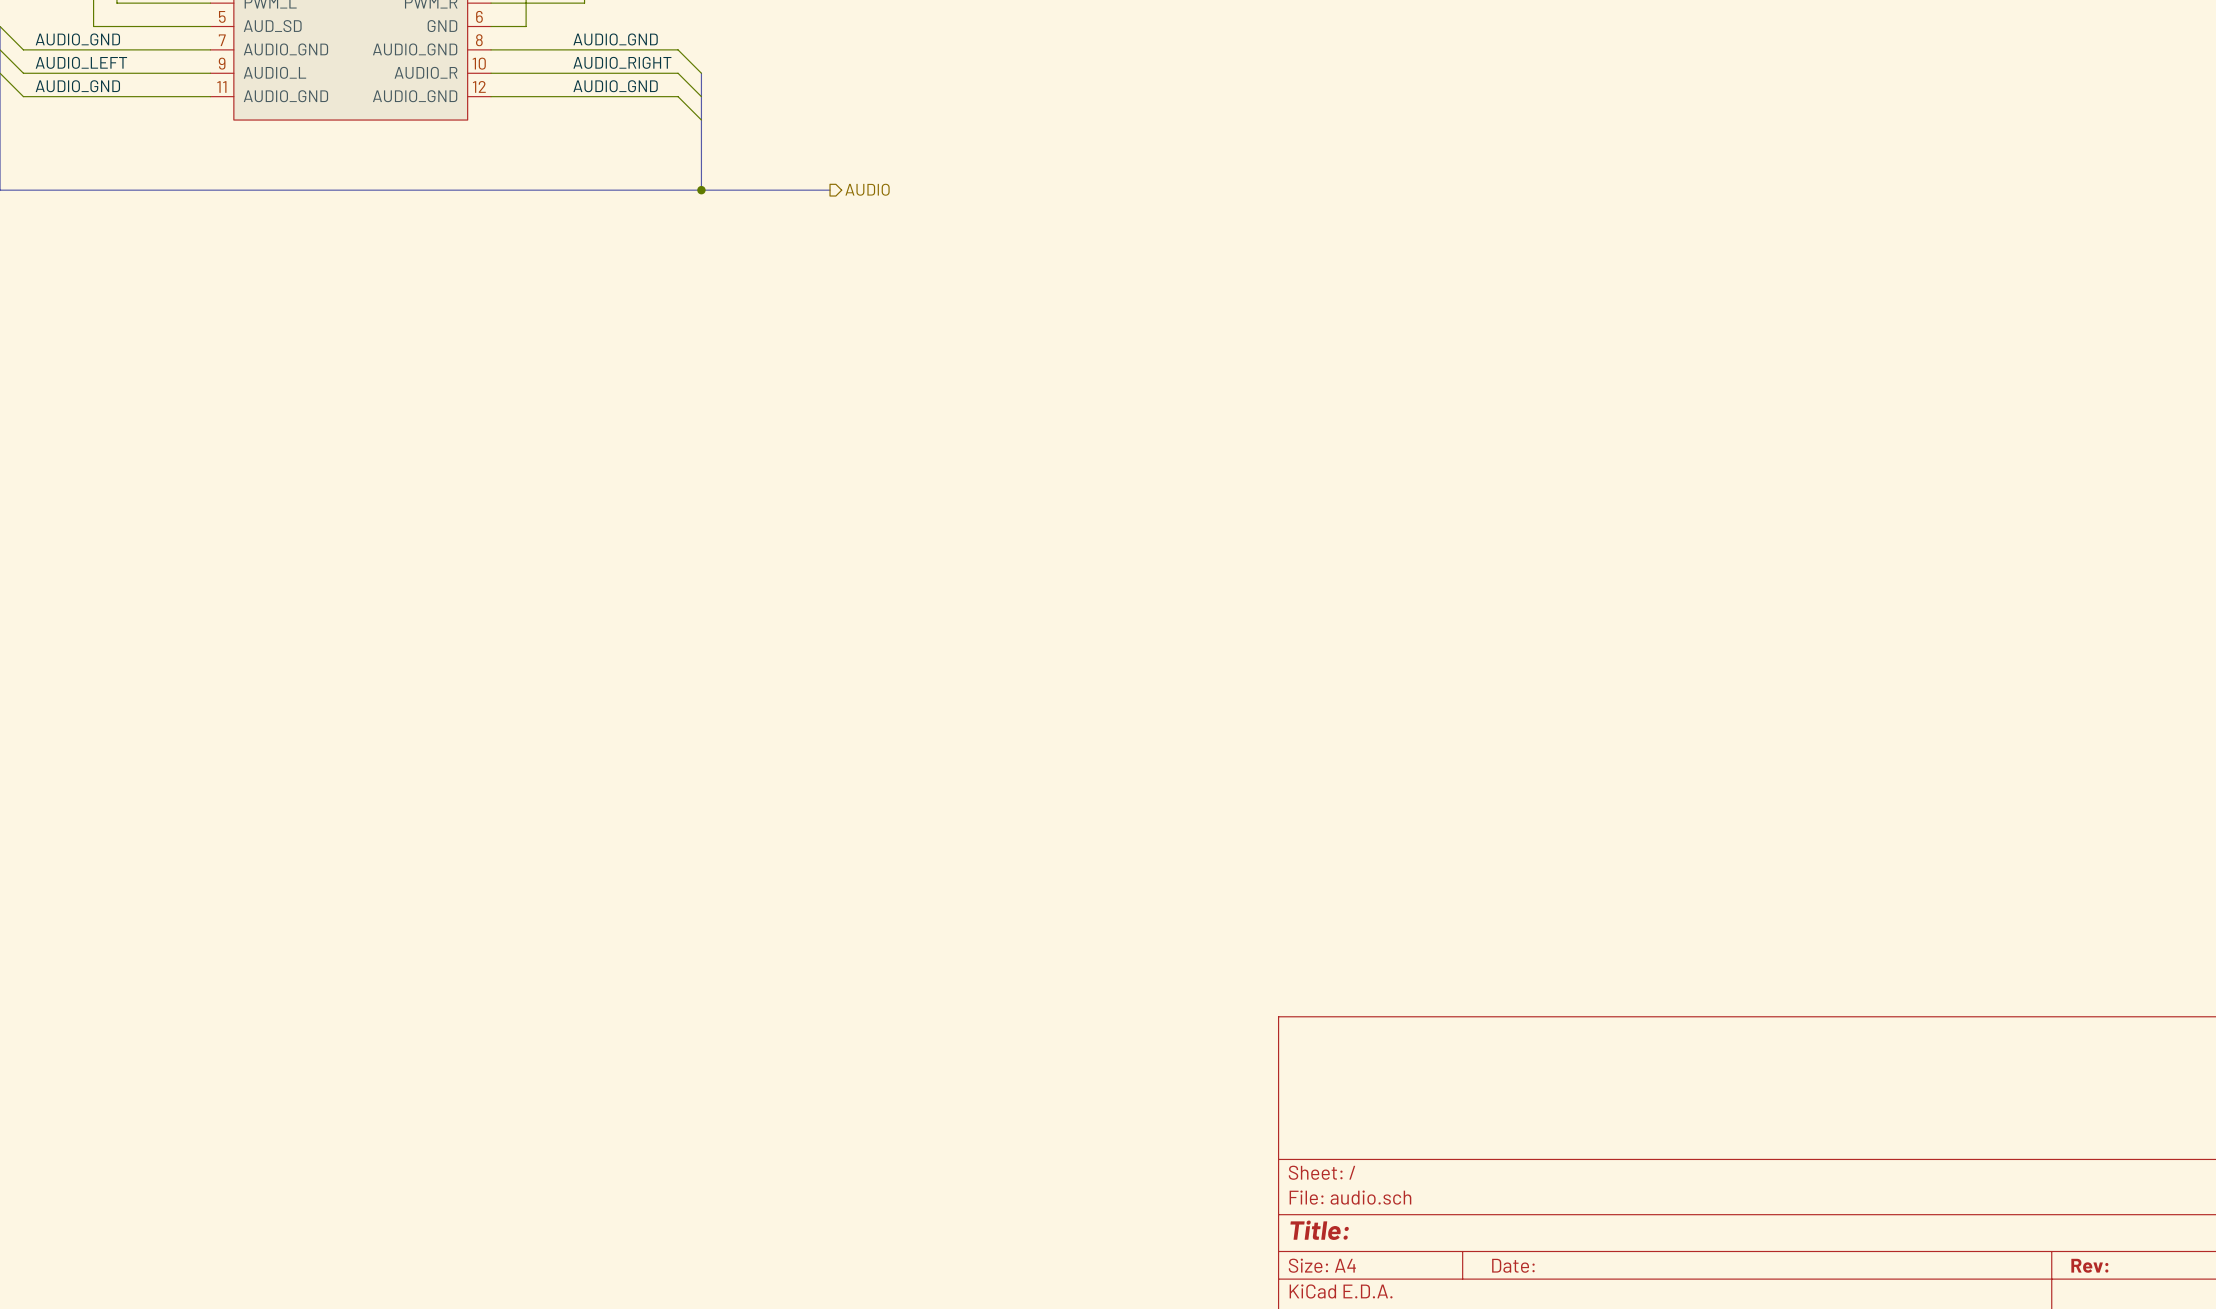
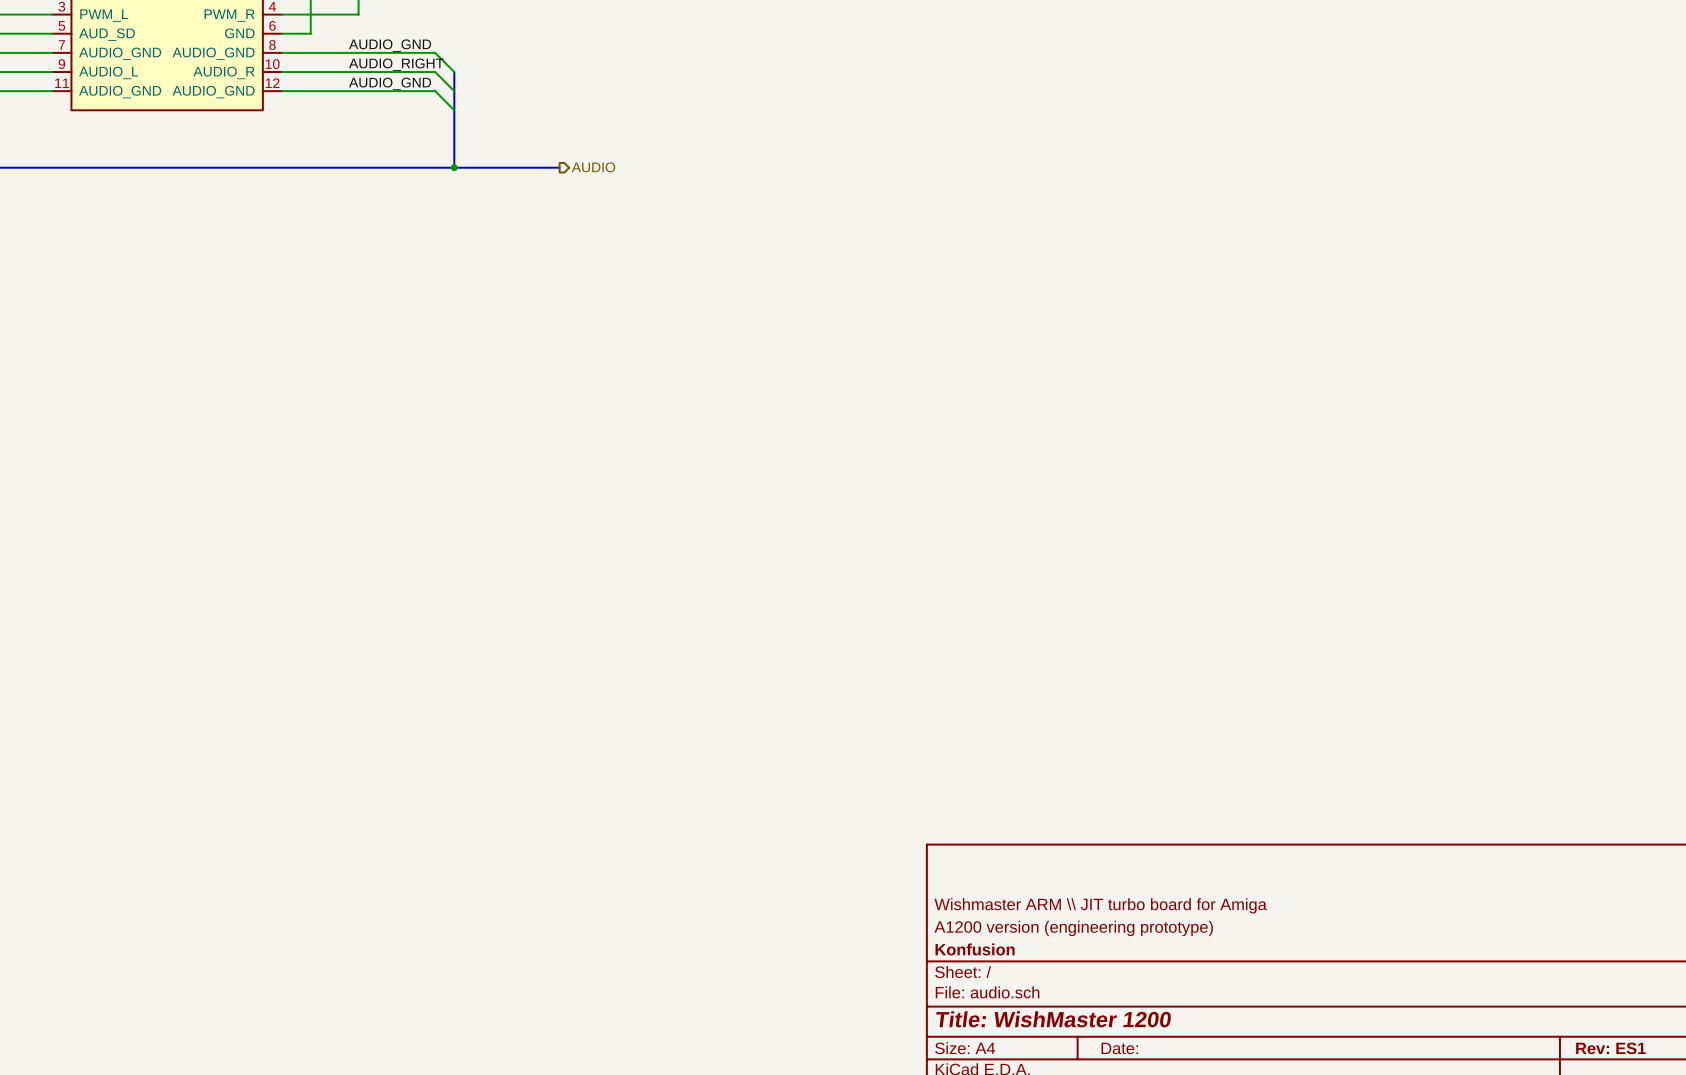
title block: none -> Wishmaster ARM \\ JIT turbo board for Amiga (1100, 905)
title block: none -> A1200 version (engineering prototype) (1073, 928)
title block: none -> Konfusion (975, 949)
title block: Title: (1319, 1230) -> Title: WishMaster 1200 (1053, 1019)
title block: Rev: (2089, 1265) -> Rev: ES1 (1610, 1048)

